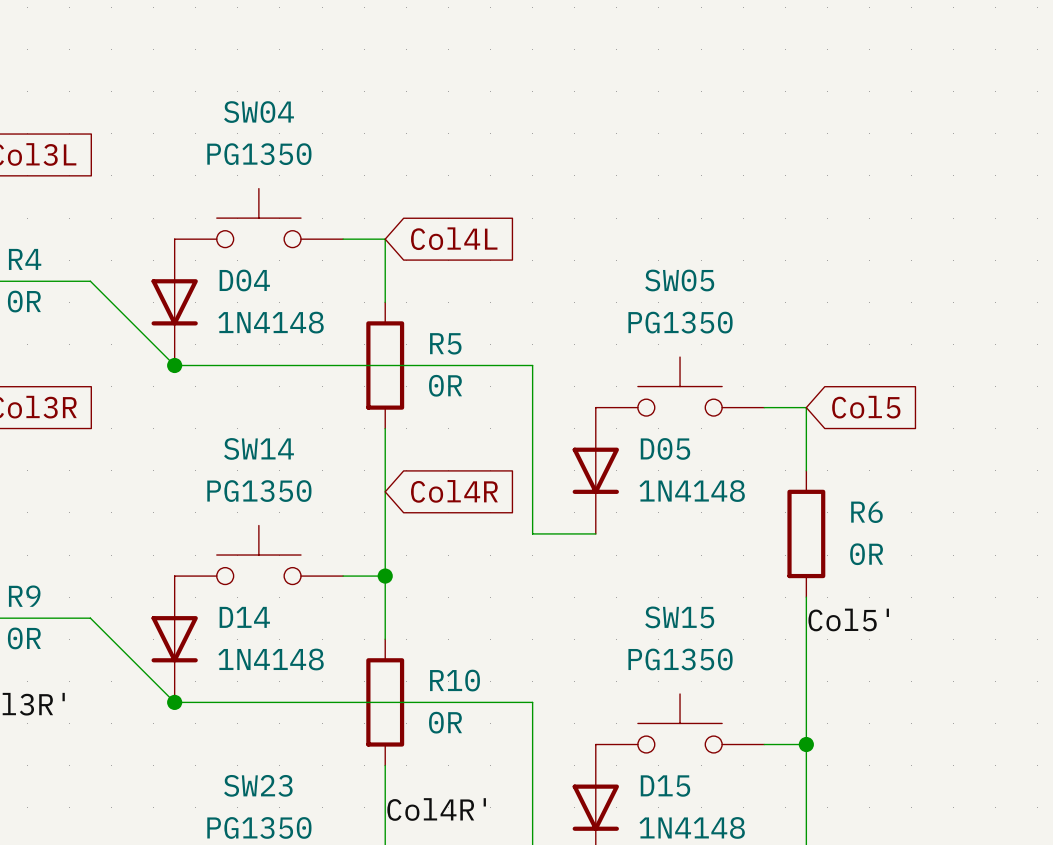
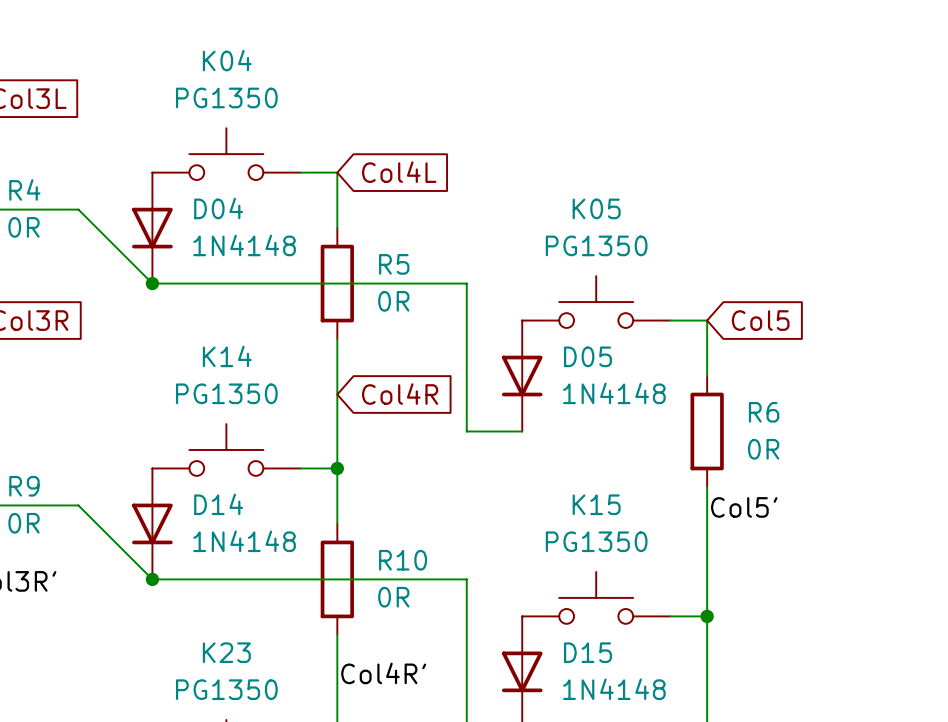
SW04 name: SW04 (258, 112) -> K04 (227, 60)
SW05 name: SW05 (679, 280) -> K05 (596, 208)
SW14 name: SW14 (258, 448) -> K14 (227, 356)
SW15 name: SW15 (679, 617) -> K15 (596, 504)
SW23 name: SW23 (258, 785) -> K23 (226, 652)

